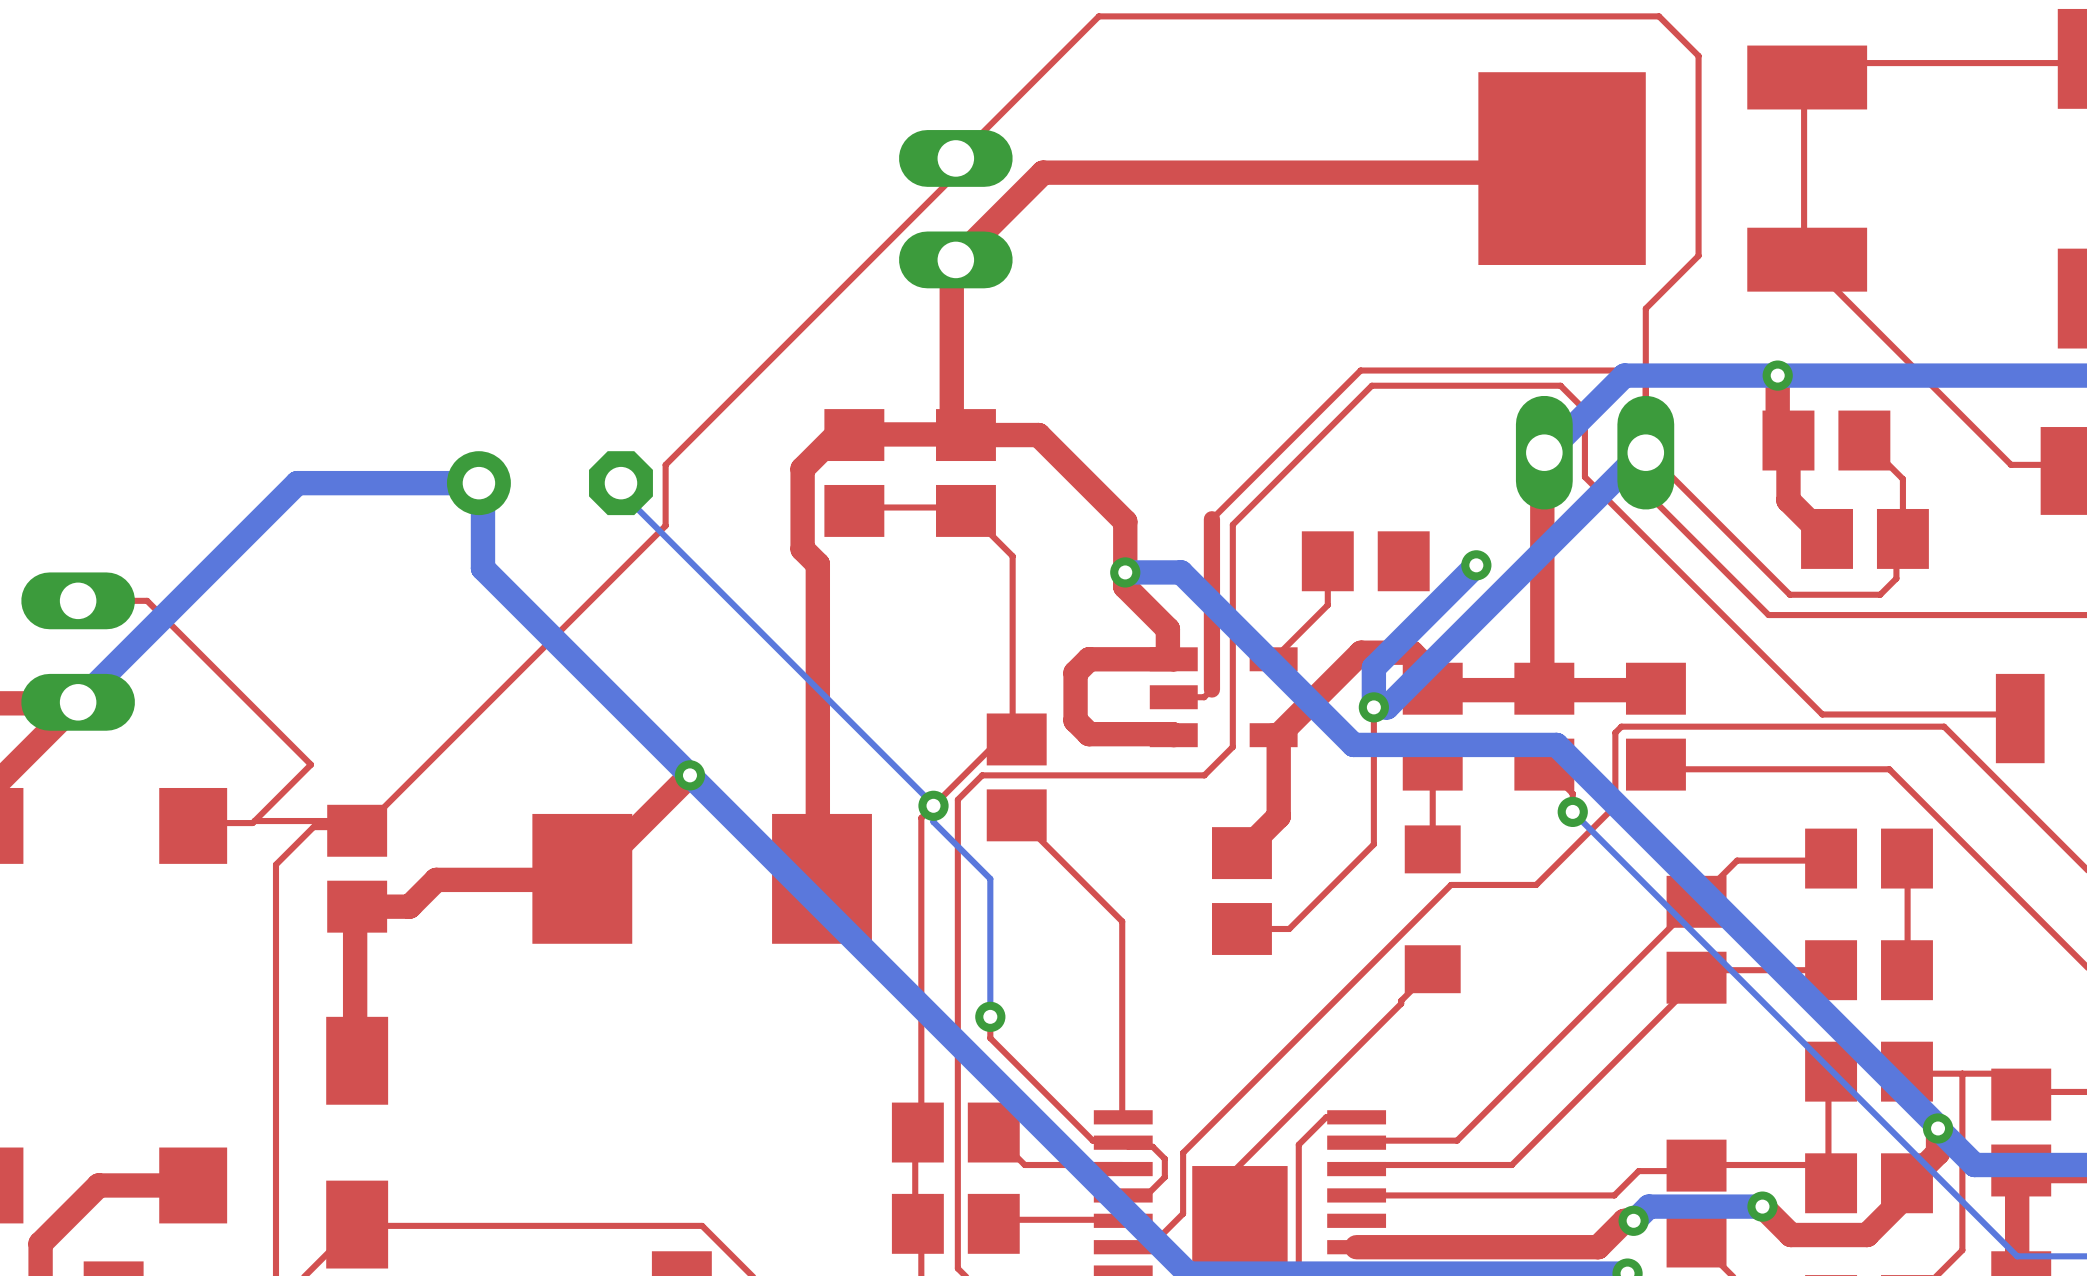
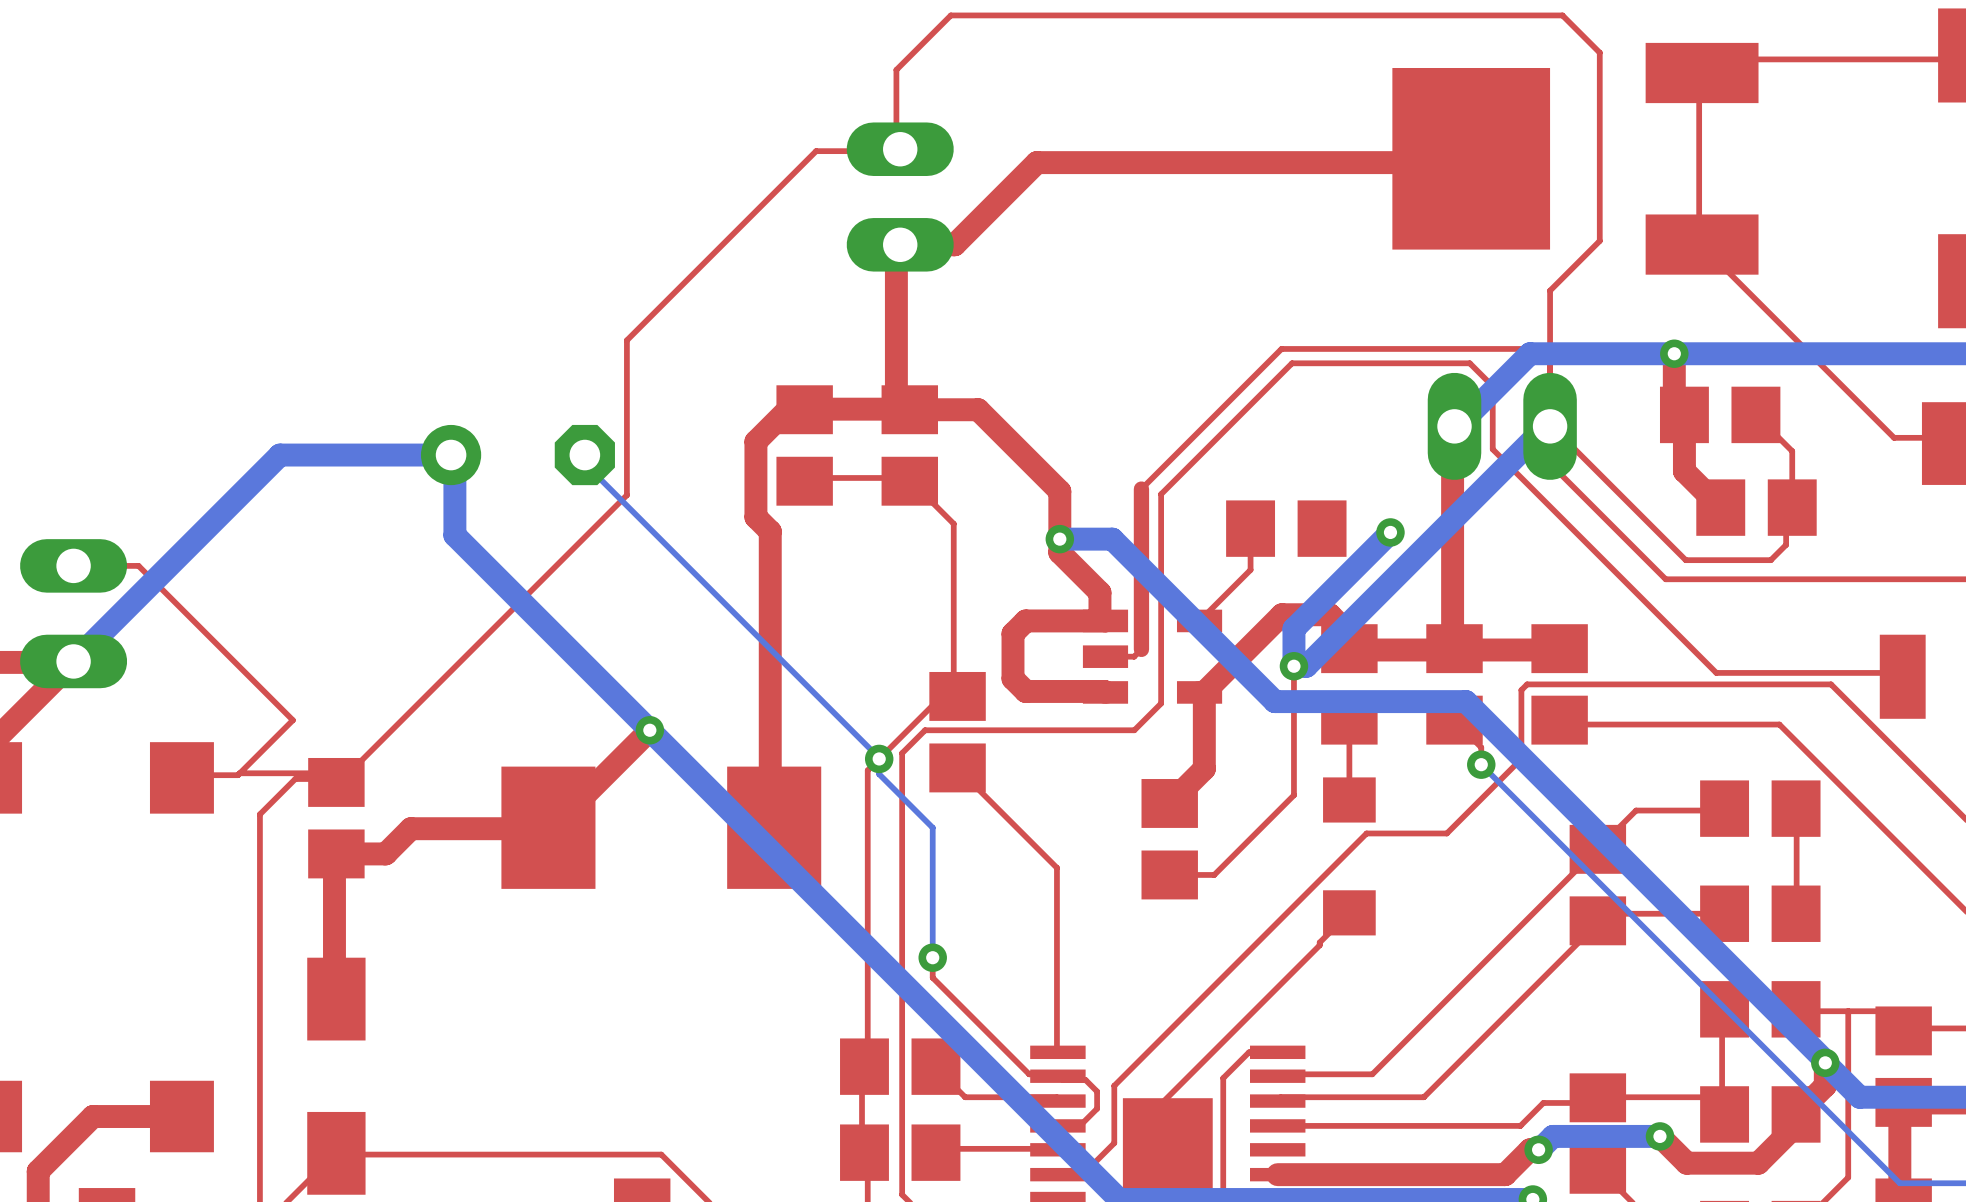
top track: (1098, 16) (951, 163) (951, 178) (665, 464) -> (1034, 15) (950, 15) (896, 69) (896, 151) (816, 151) (626, 340) (626, 437)
top track: (1100, 172) (1043, 172) (955, 259) -> (1036, 162) (954, 244) (900, 244)

